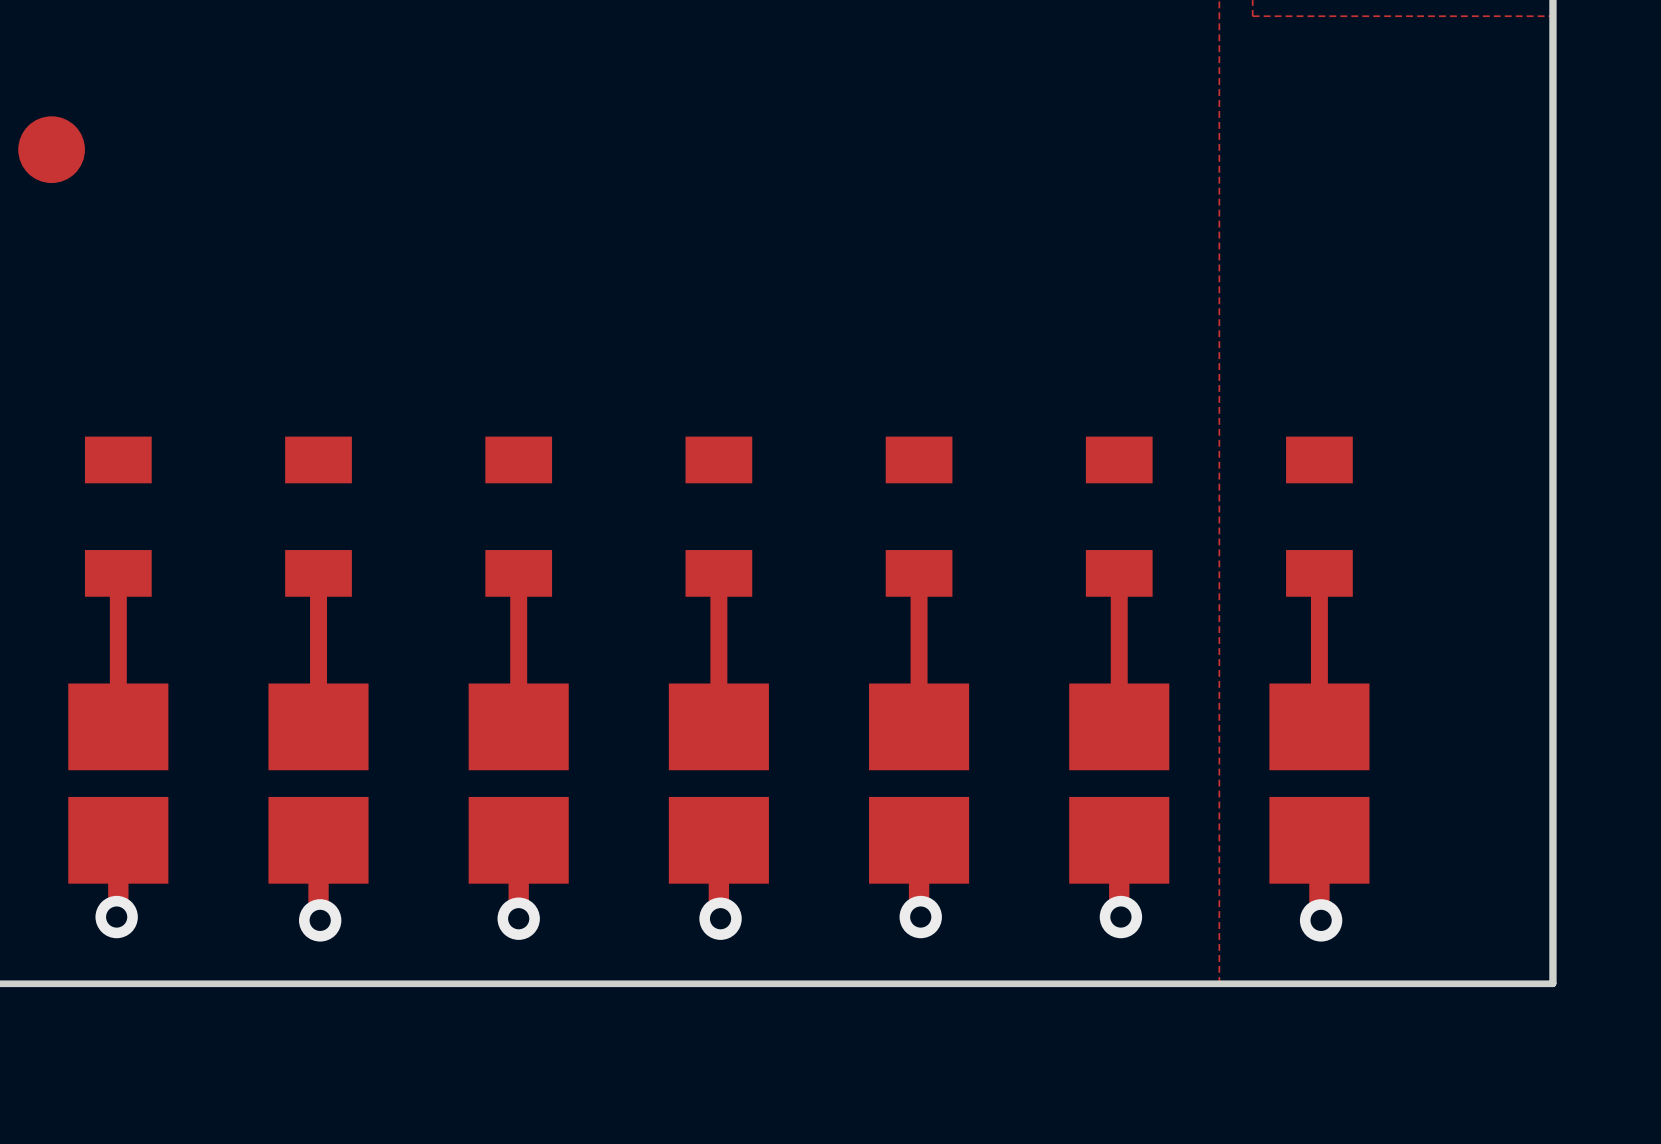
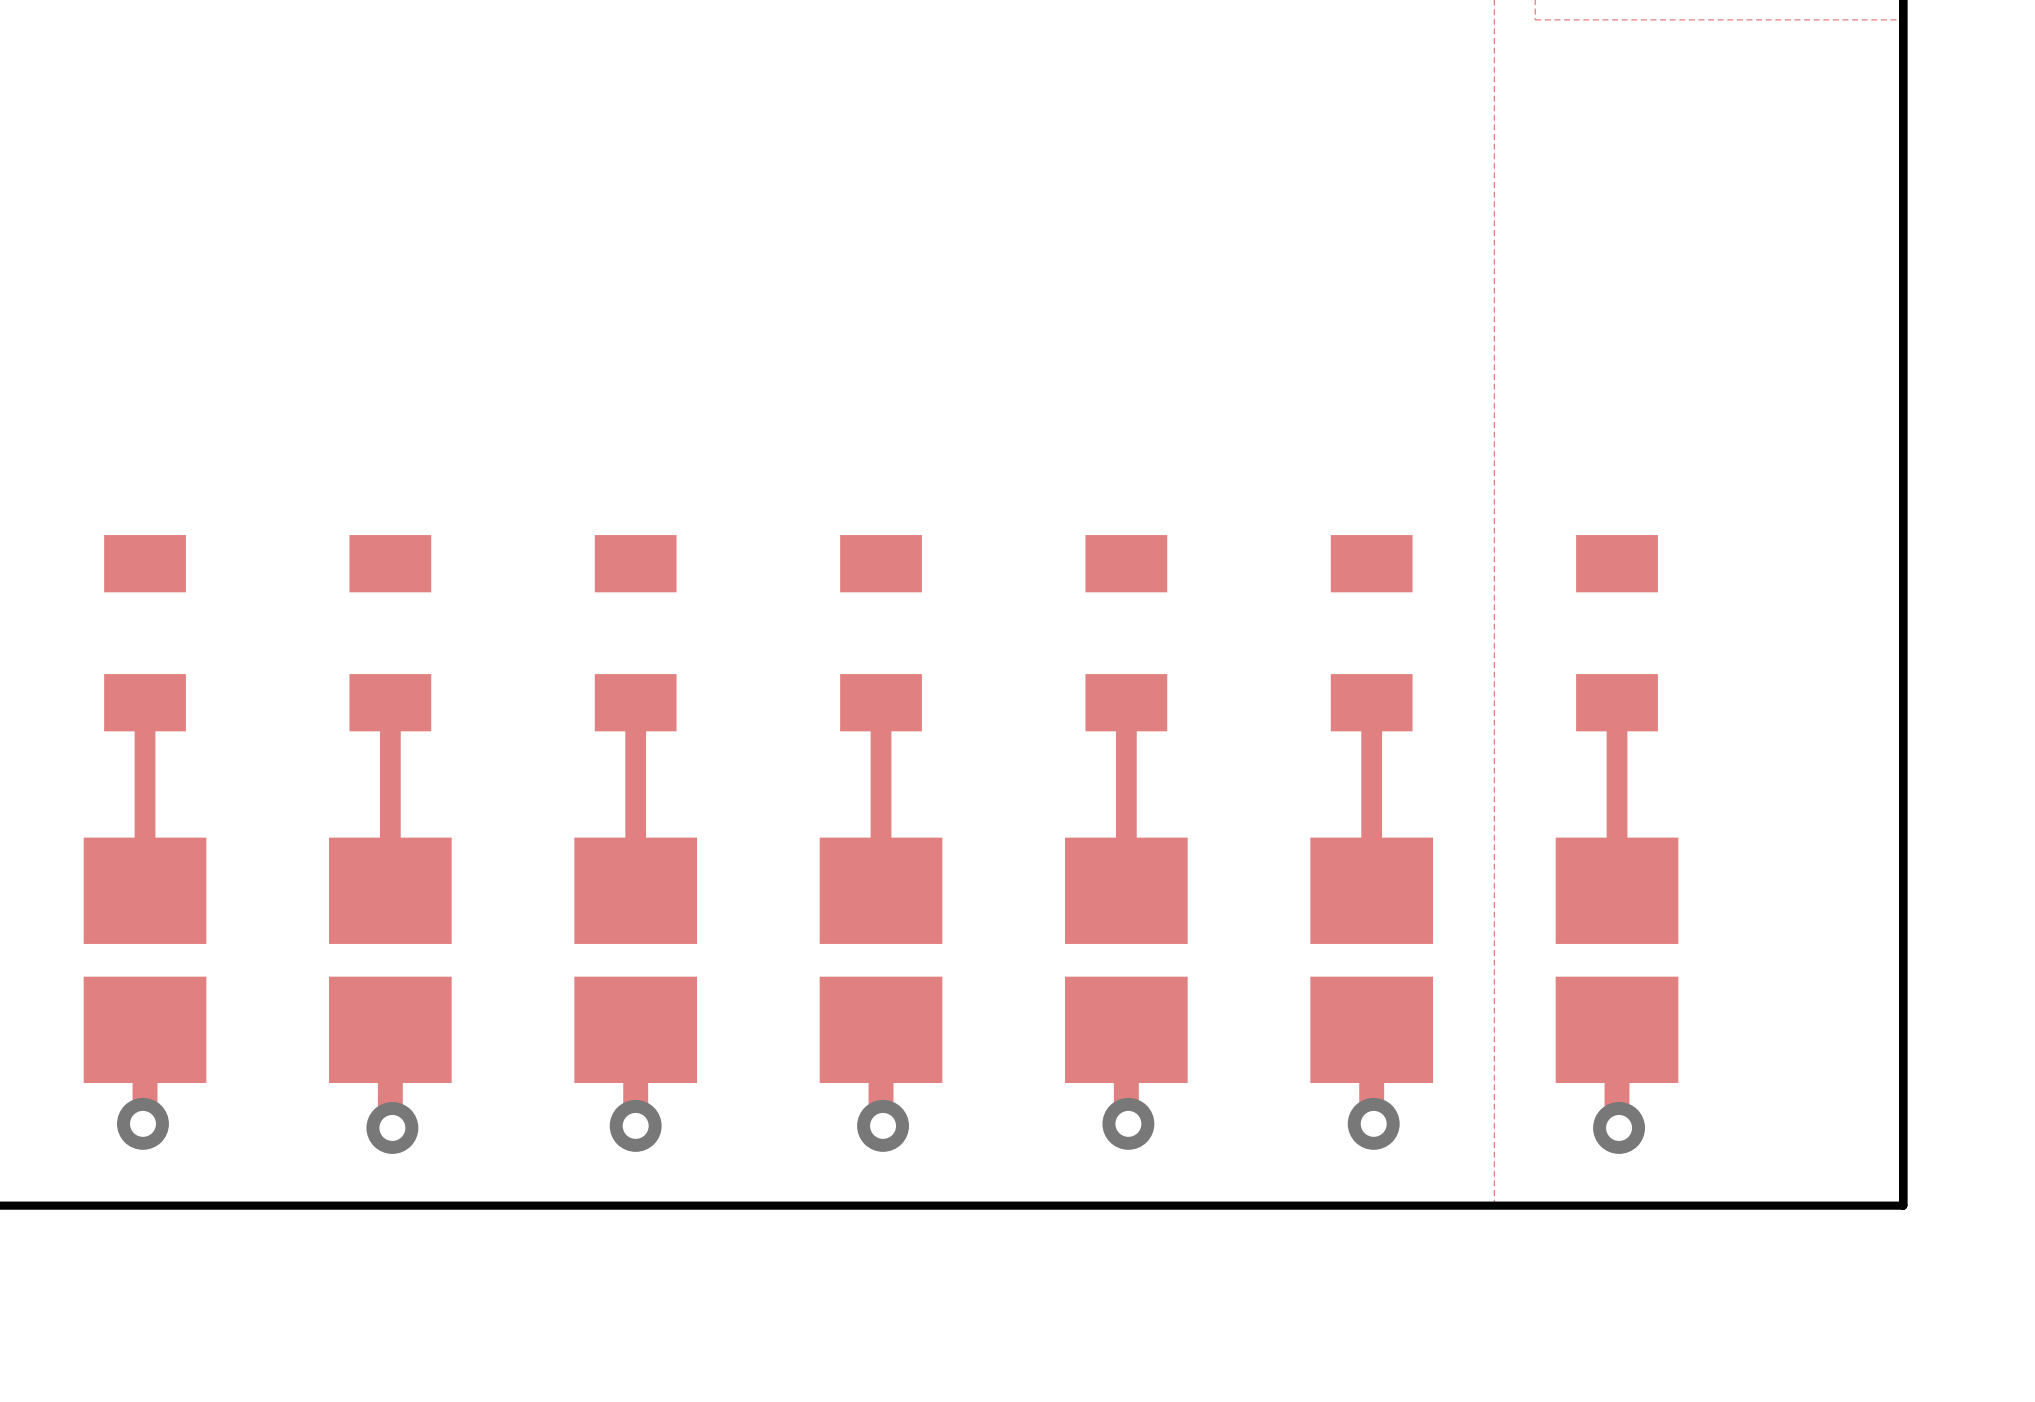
part: (51, 149) -> none

